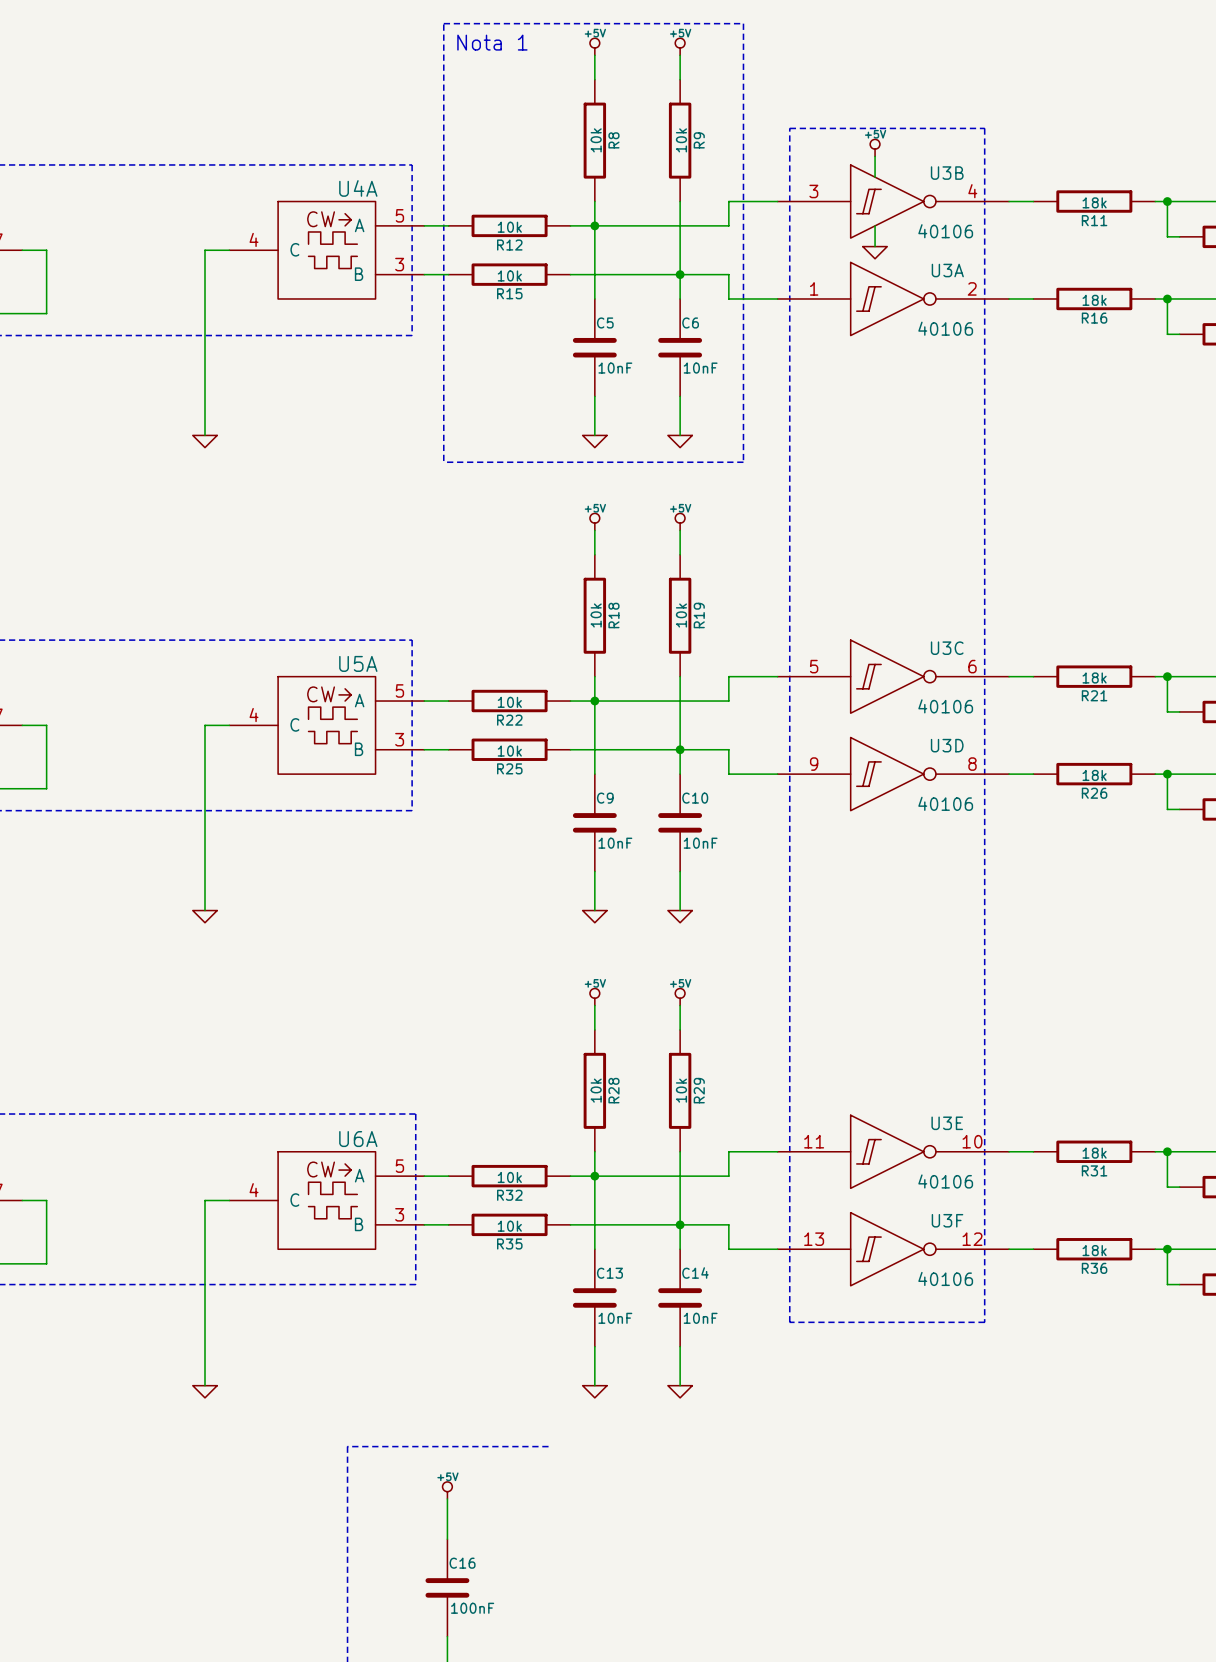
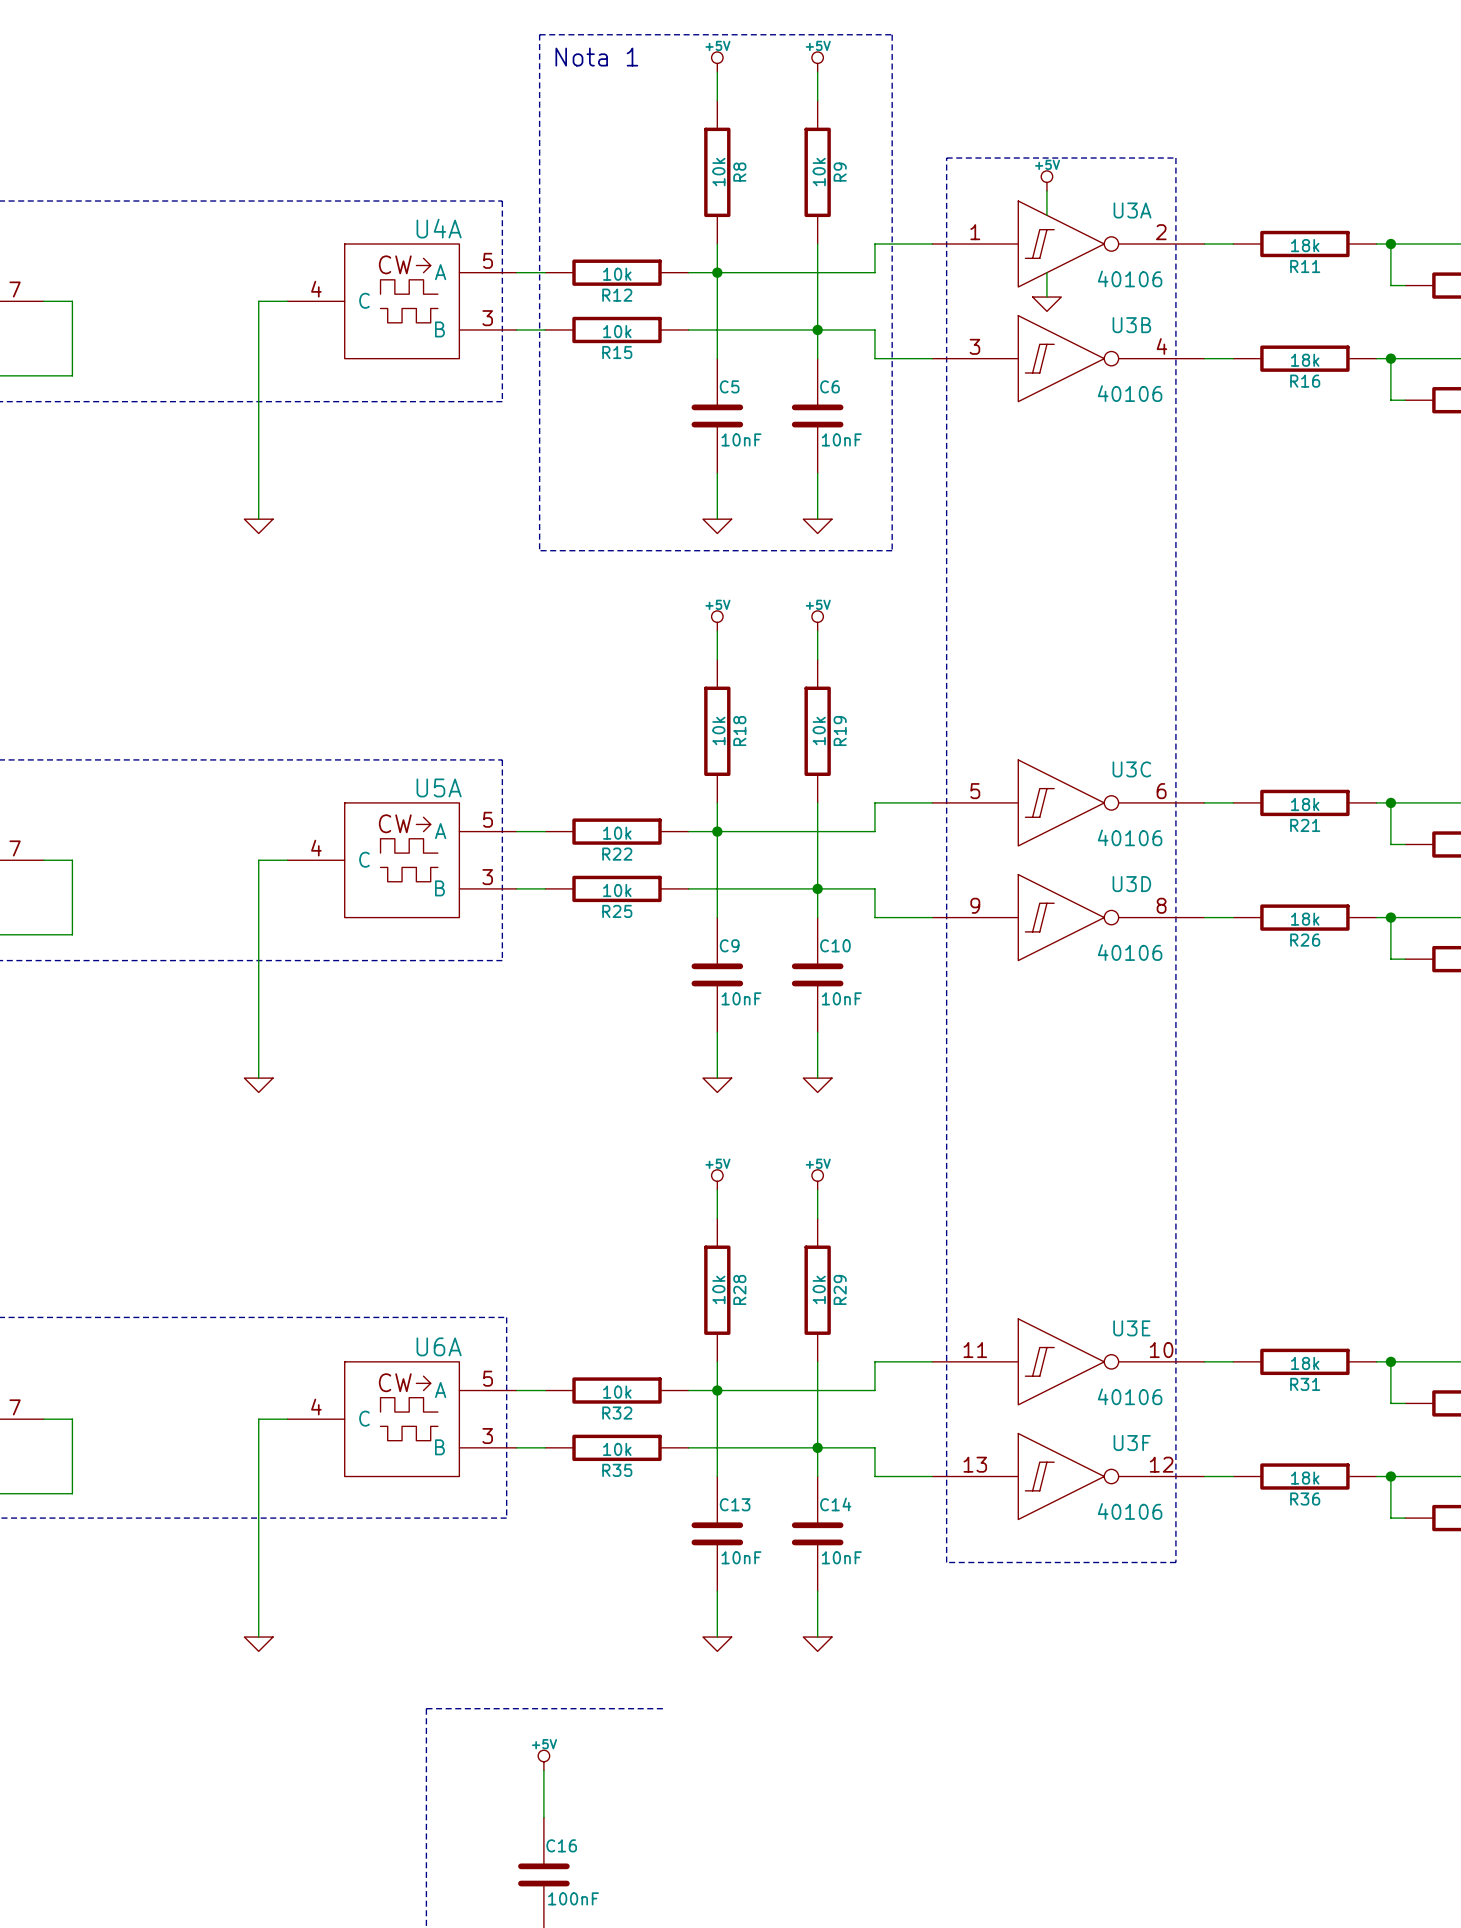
U3B position: (893, 201) -> (1068, 358)
U3A position: (893, 298) -> (1068, 244)

